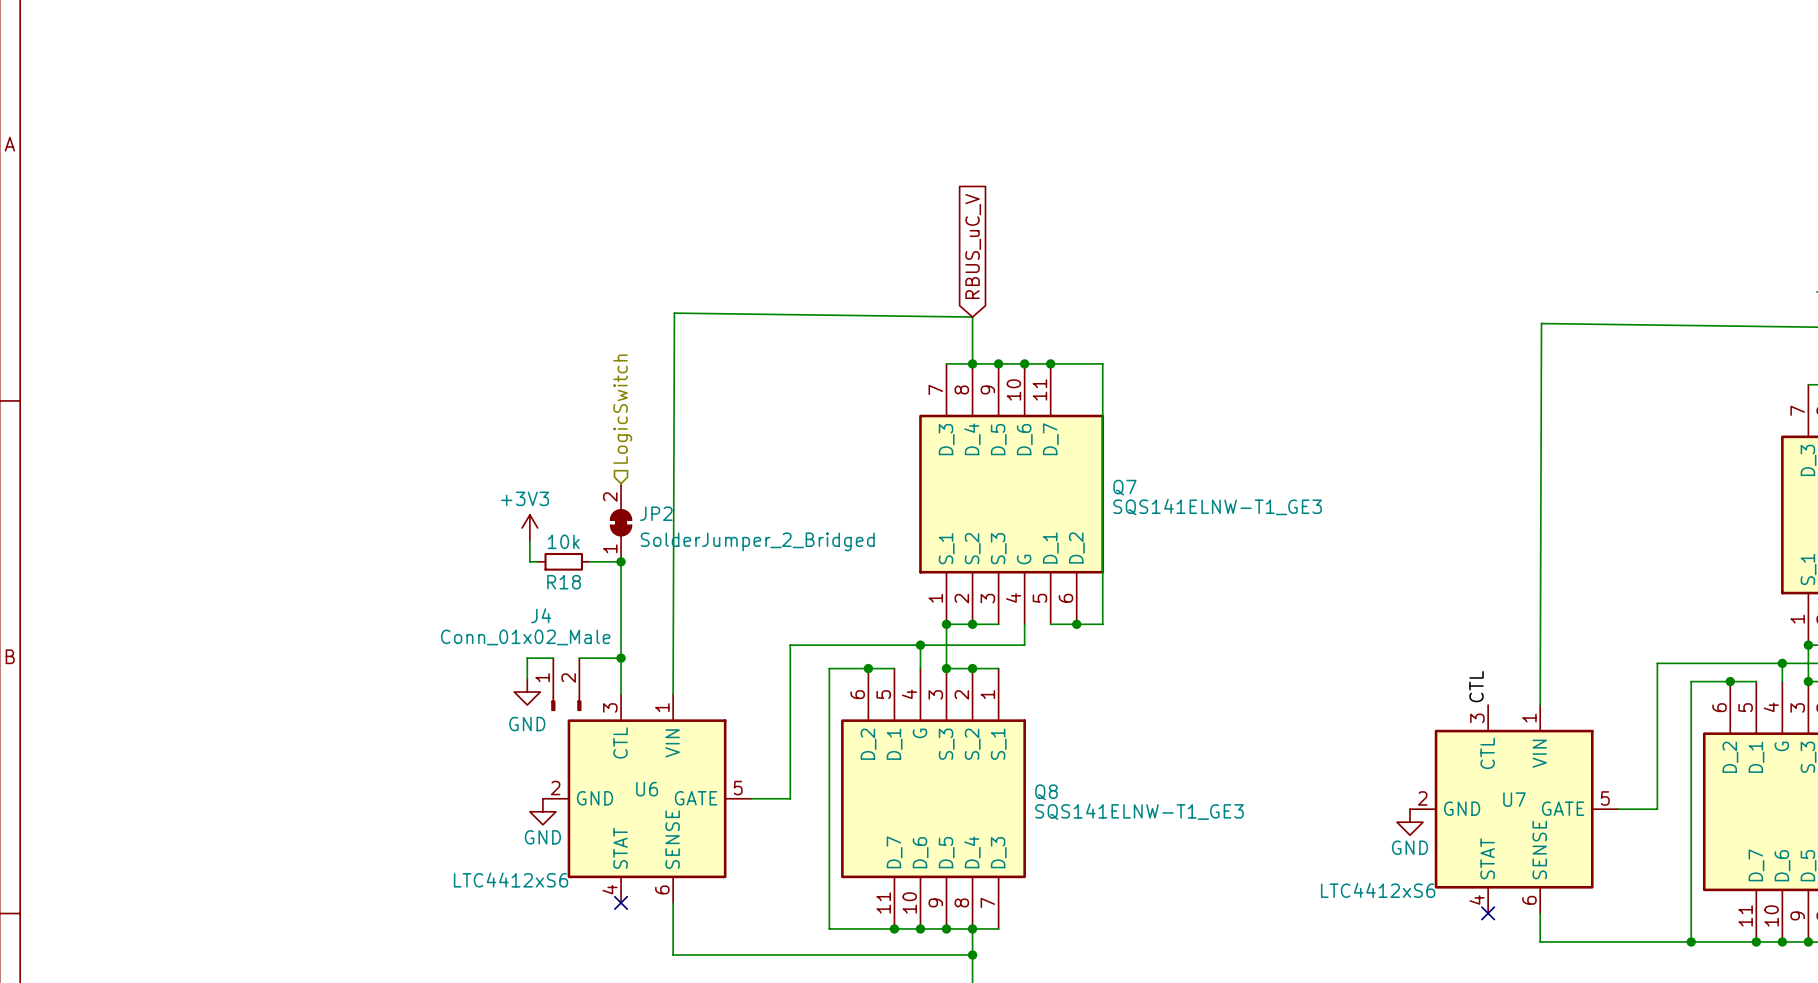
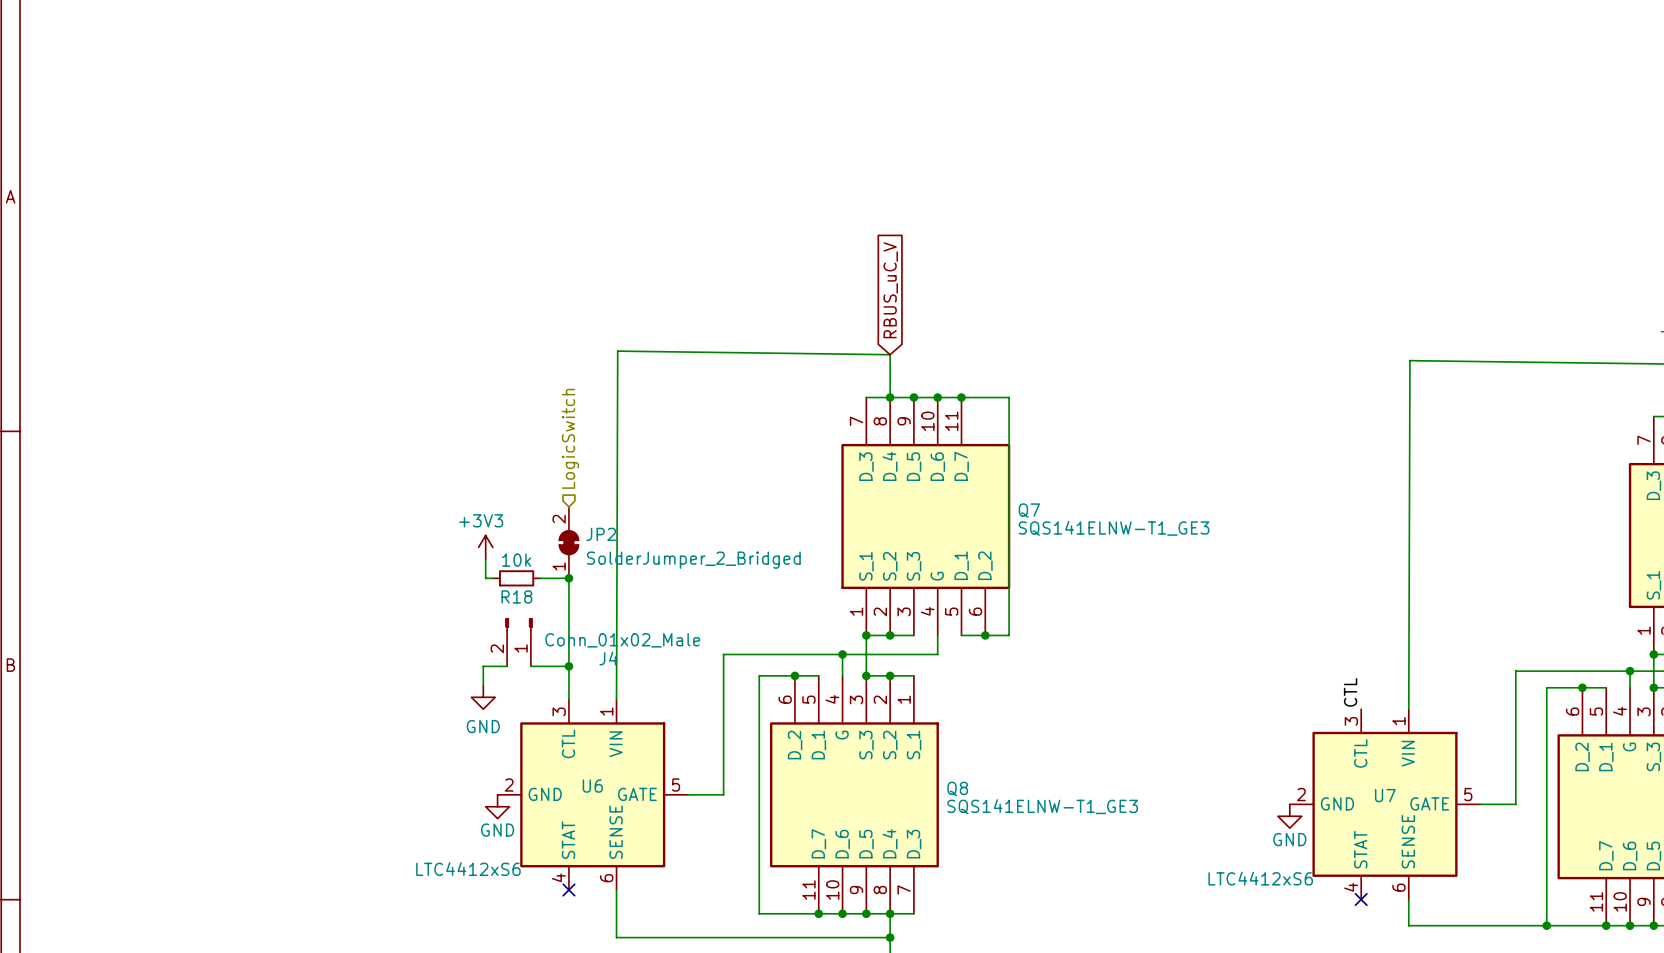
J4 name position: J4 (541, 615) -> J4 (608, 658)
J4 value position: Conn_01x02_Male (525, 637) -> Conn_01x02_Male (622, 640)
J4 position: (566, 684) -> (518, 642)
J4 rotation: 0° (566, 703) -> 180° (518, 624)

